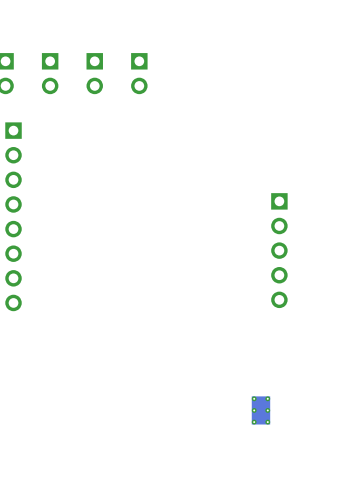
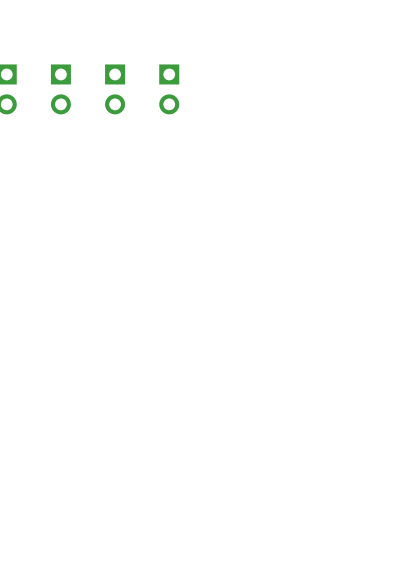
part: (13, 216) -> none
part: (279, 250) -> none
part: (260, 410) -> none

